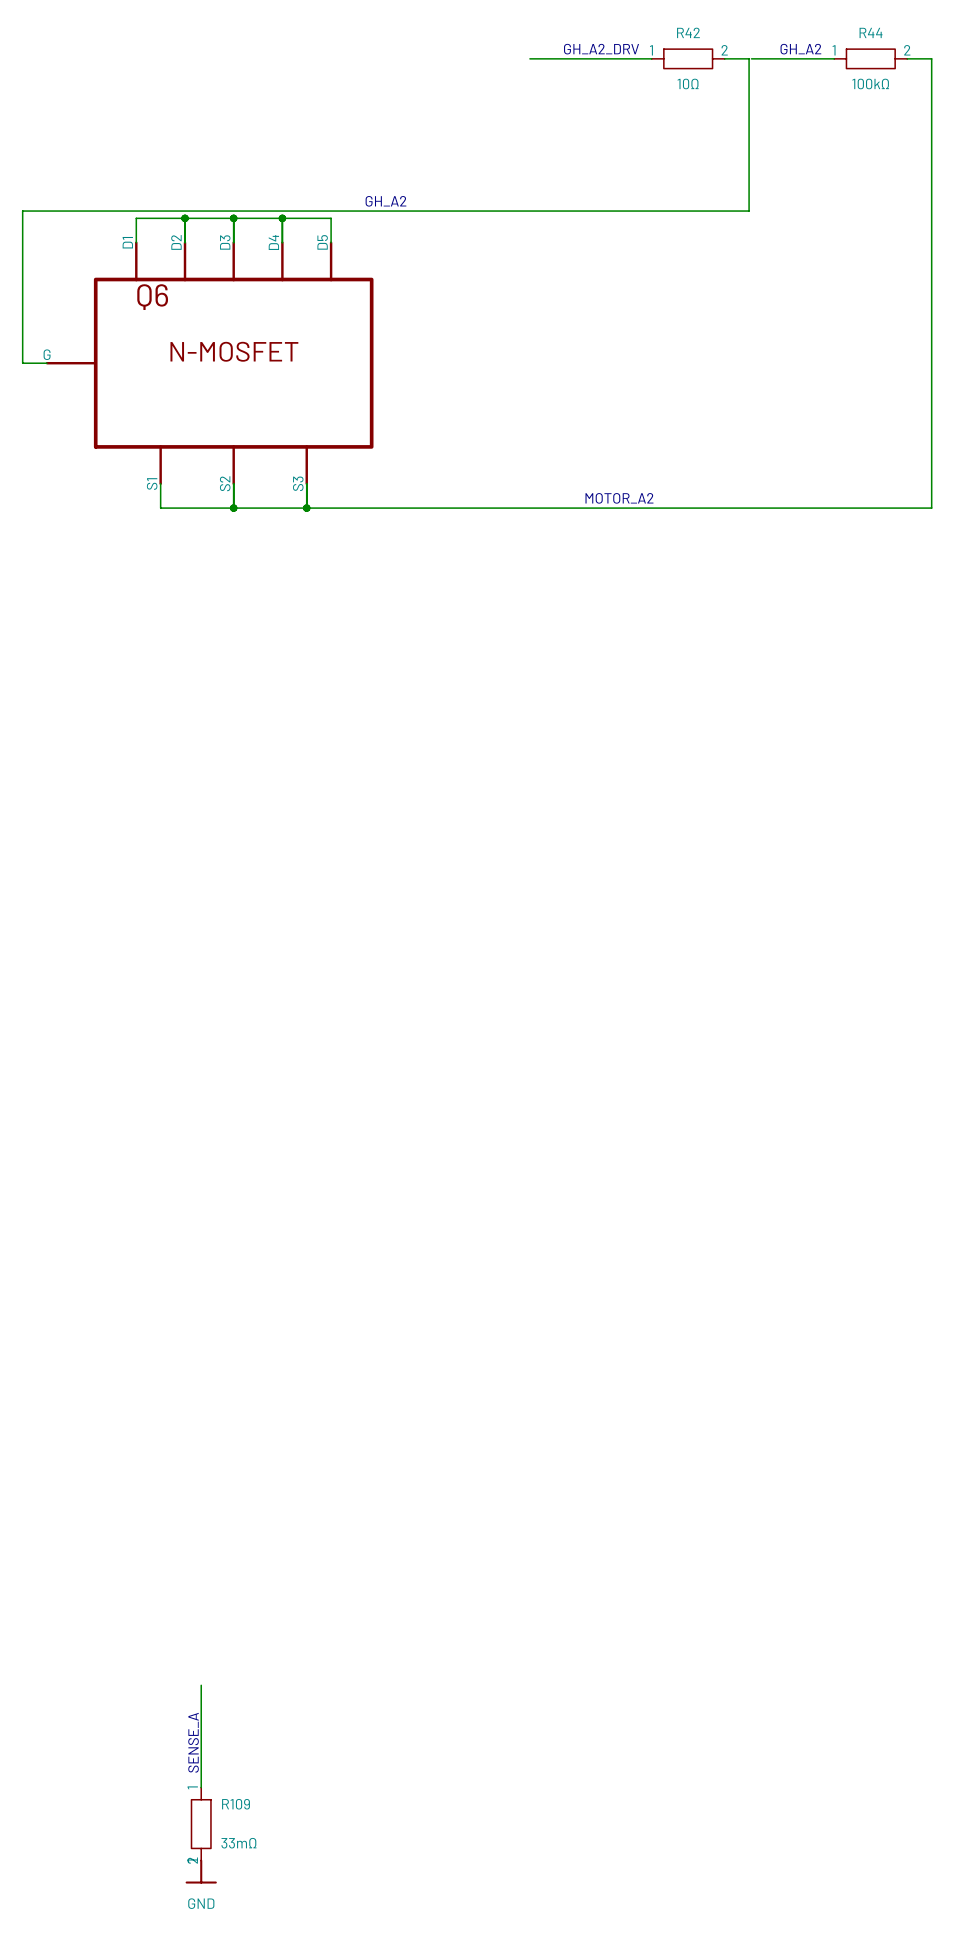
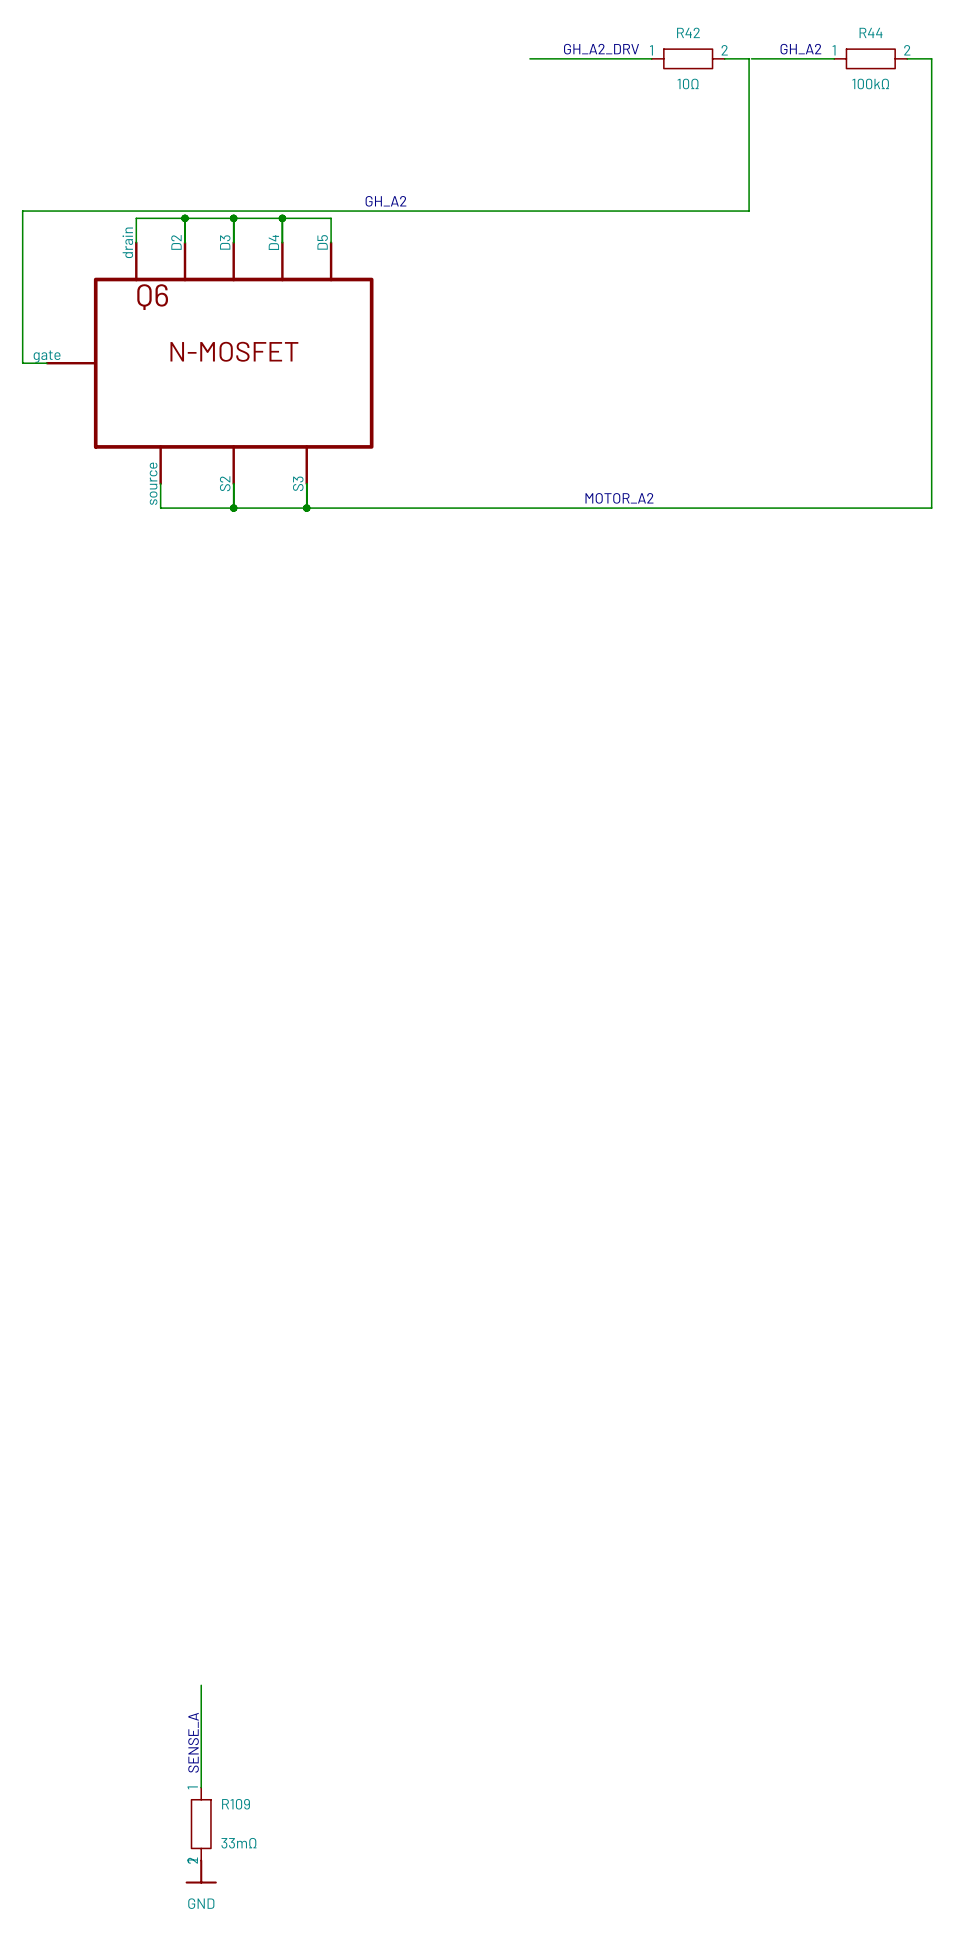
part pin name: D1 (127, 242) -> drain (127, 242)
part pin name: G (47, 354) -> gate (47, 356)
part pin name: S1 (152, 483) -> source (153, 483)

